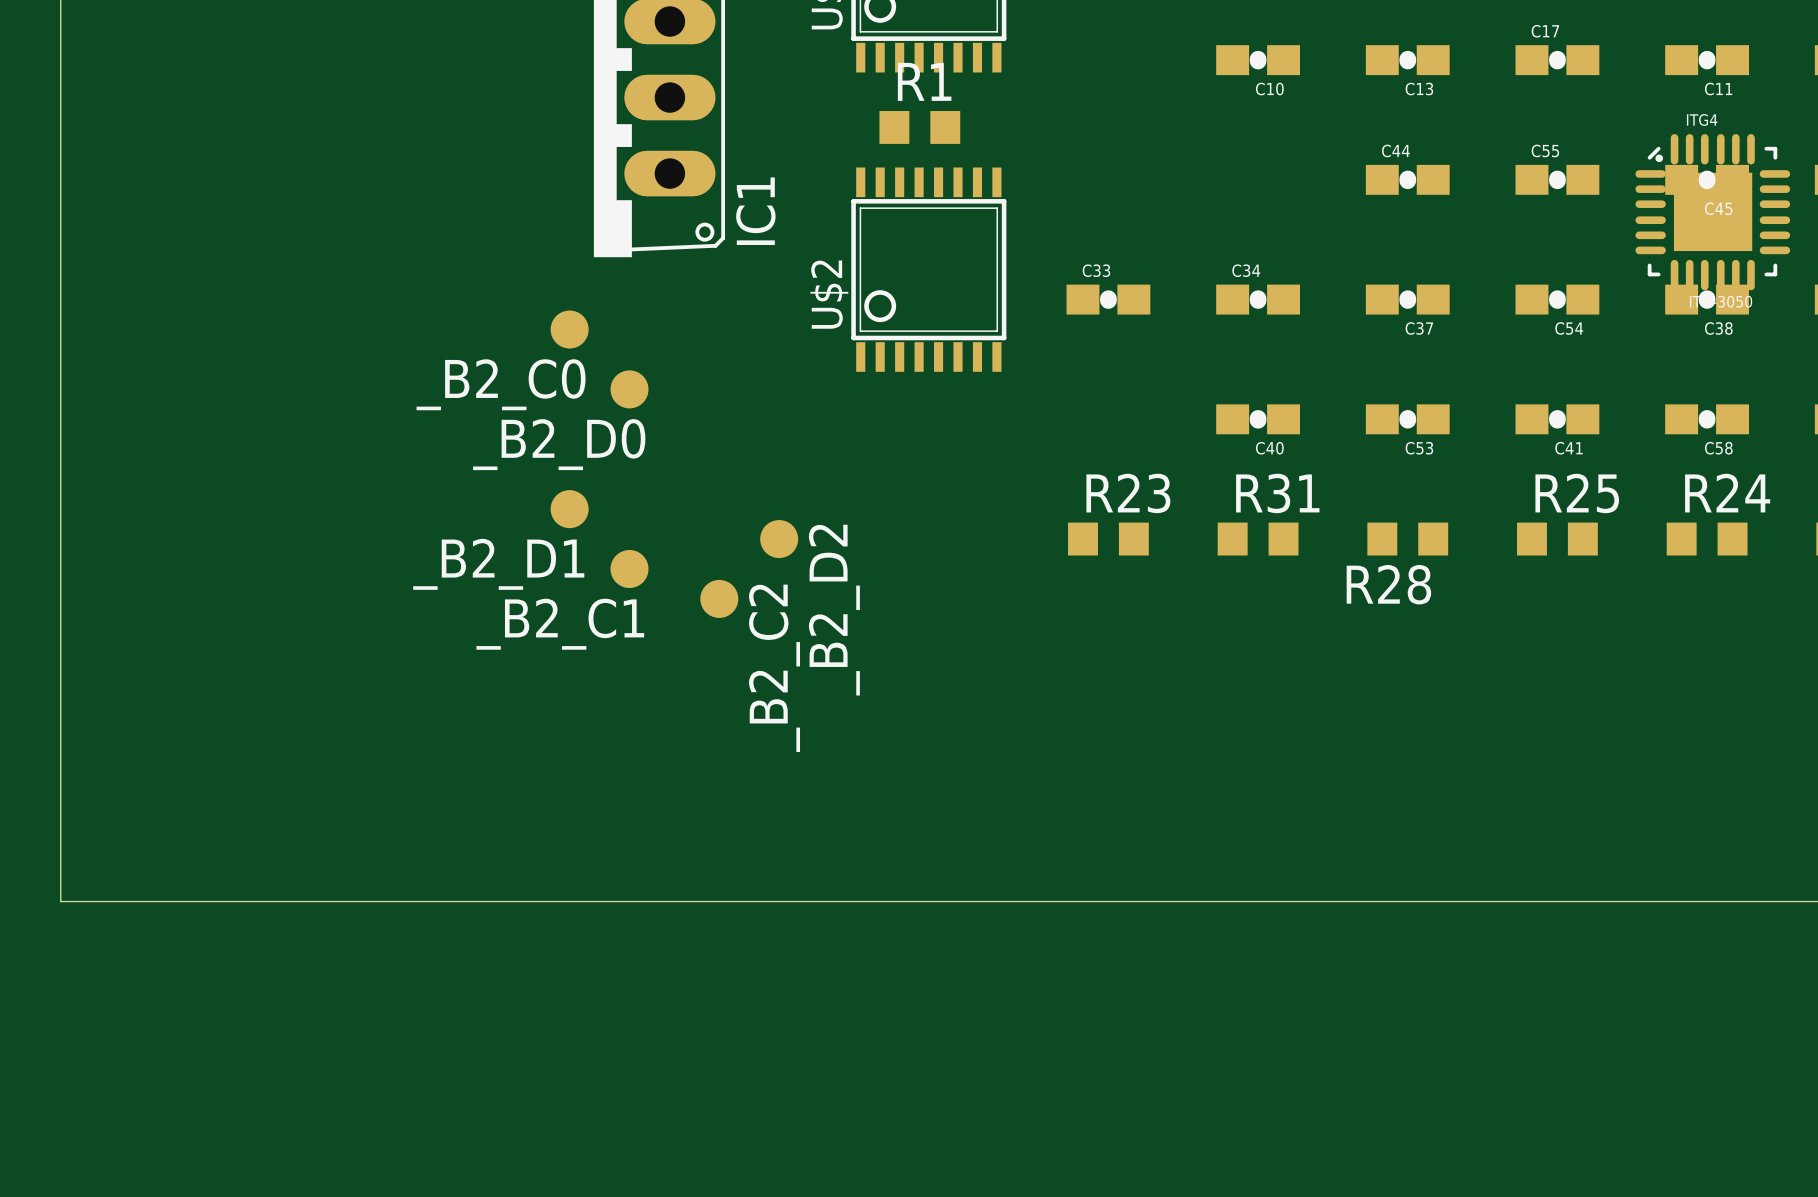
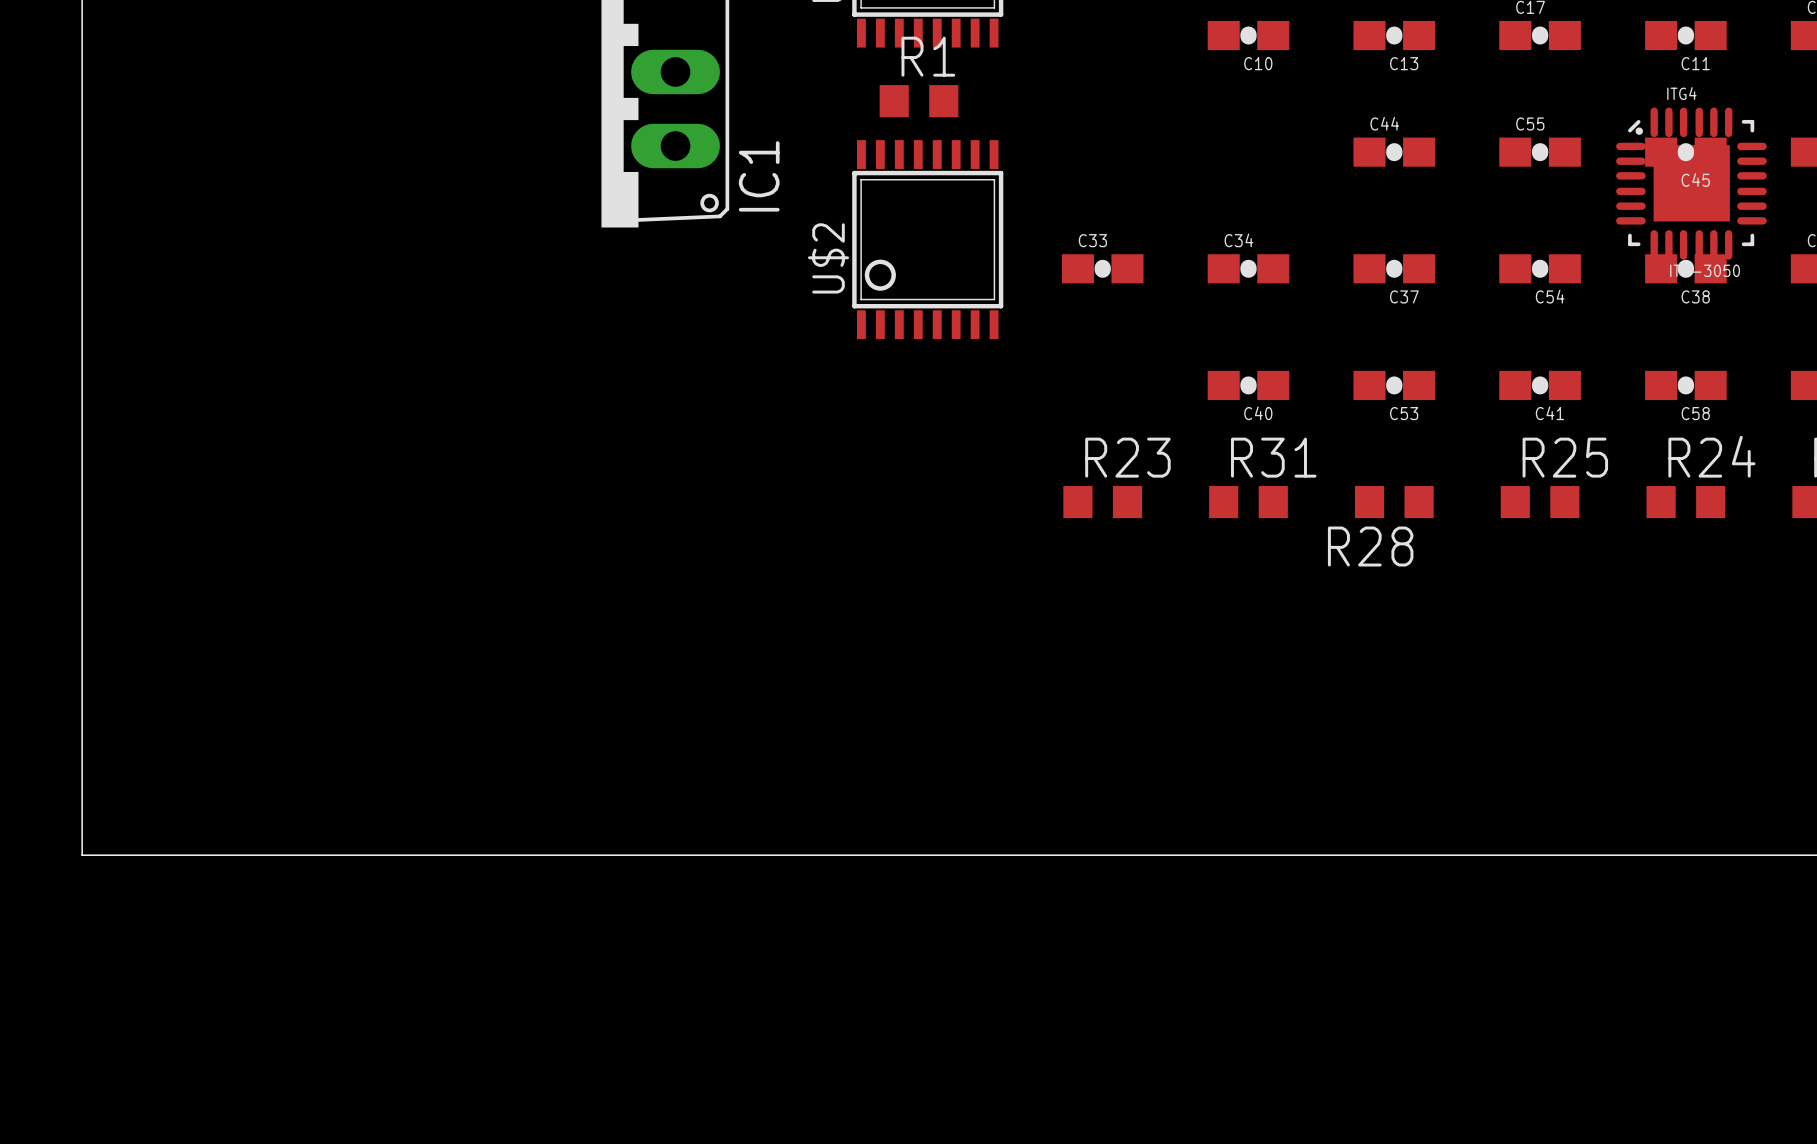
_B2_C0: (569, 329) -> none
_B2_D0: (629, 389) -> none
_B2_D1: (569, 509) -> none
_B2_D2: (779, 539) -> none
_B2_C1: (629, 568) -> none
_B2_C2: (719, 598) -> none

